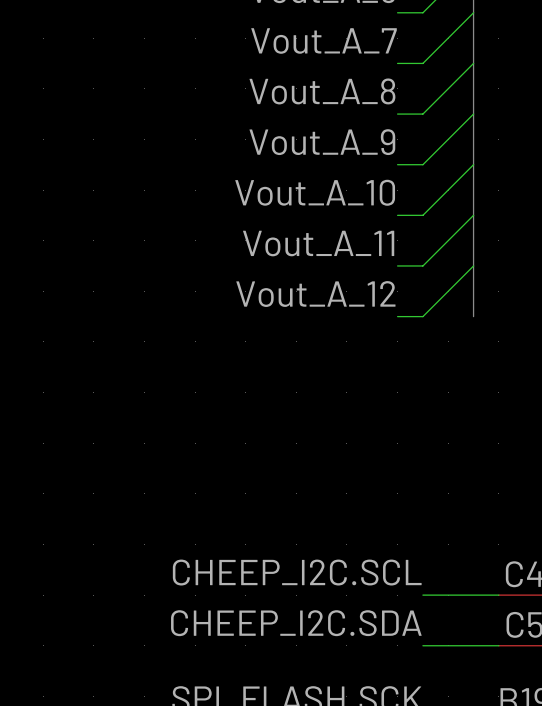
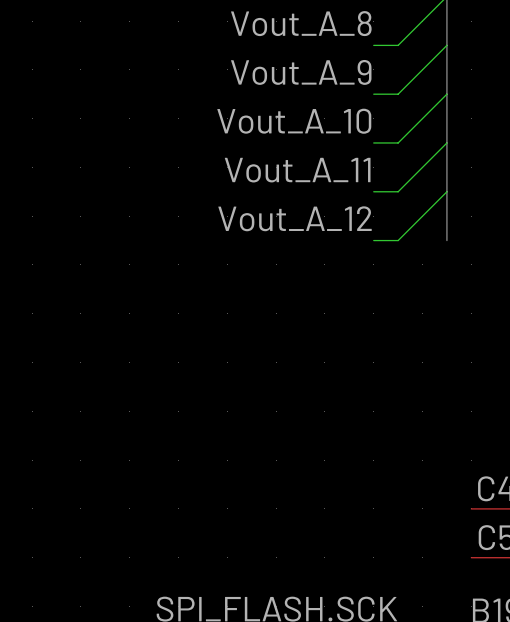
label: CHEEP_I2C.SCL (297, 572) -> none
wire: (422, 595) (498, 595) -> none
label: CHEEP_I2C.SDA (296, 623) -> none
wire: (422, 645) (498, 645) -> none

